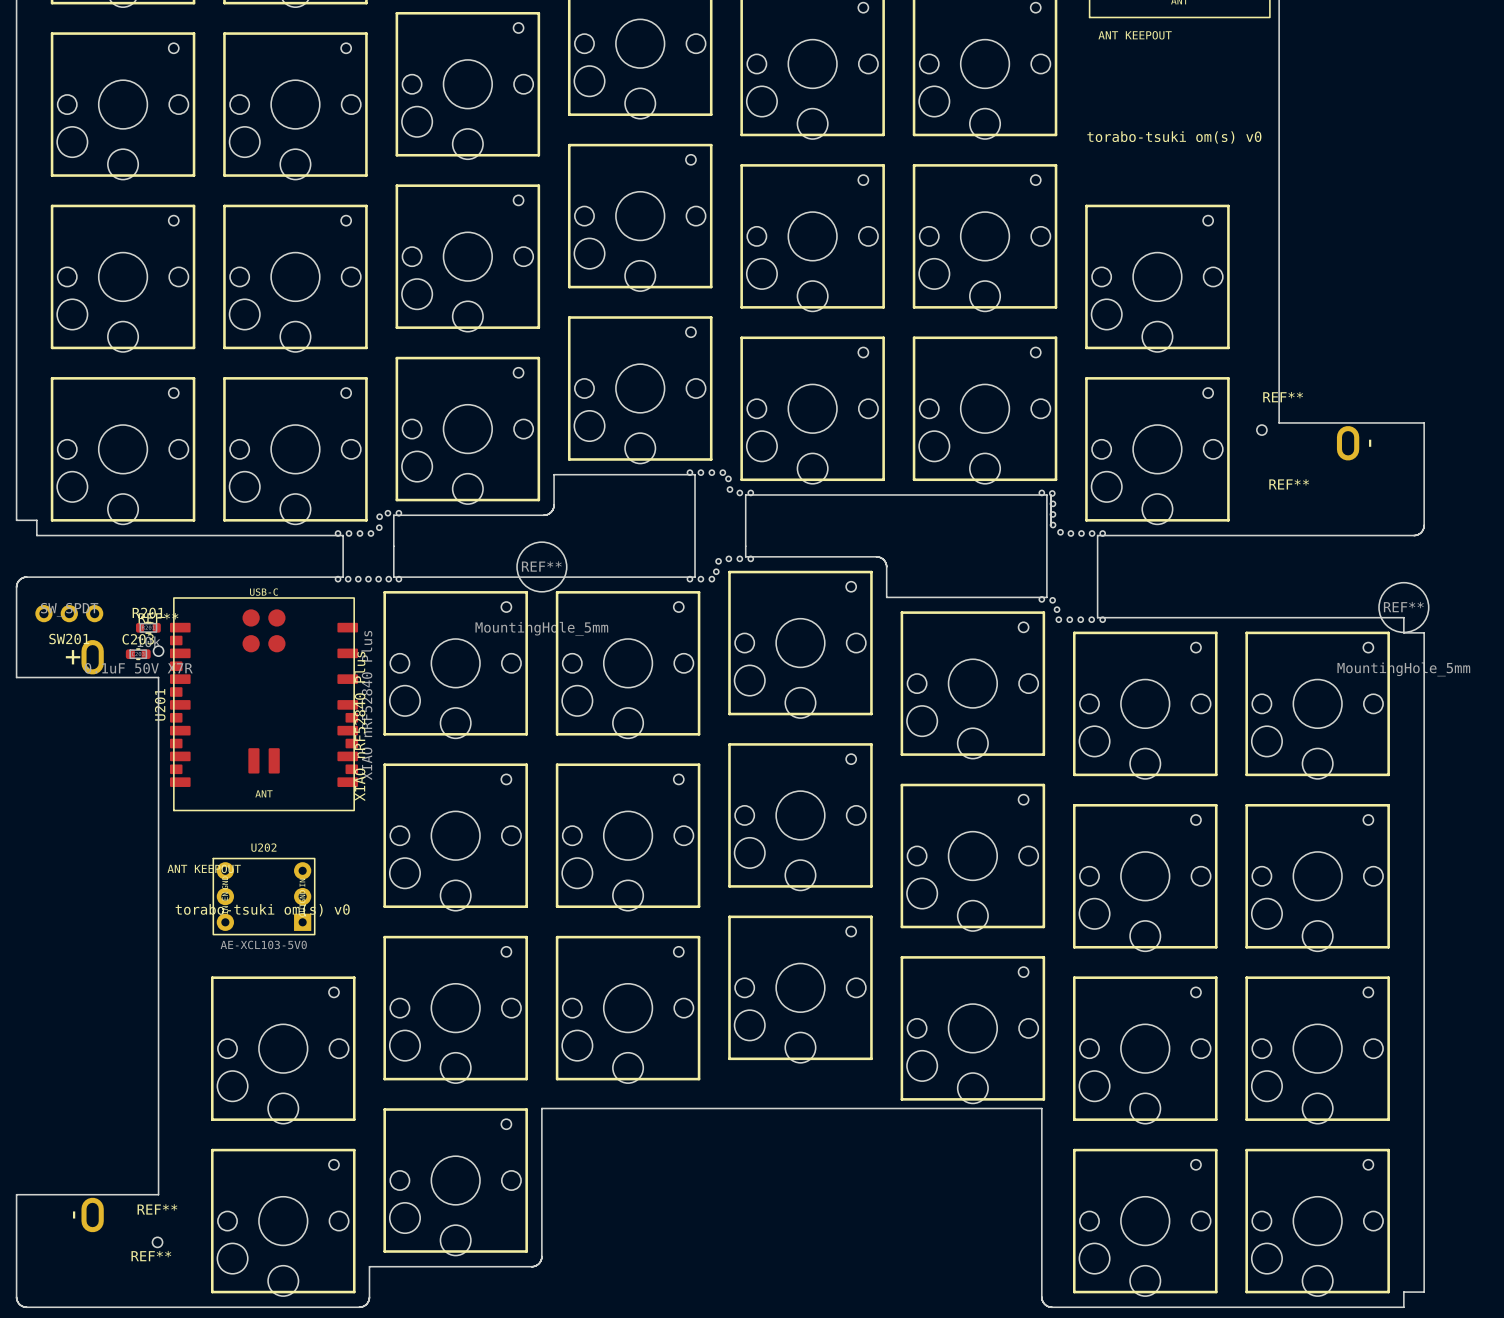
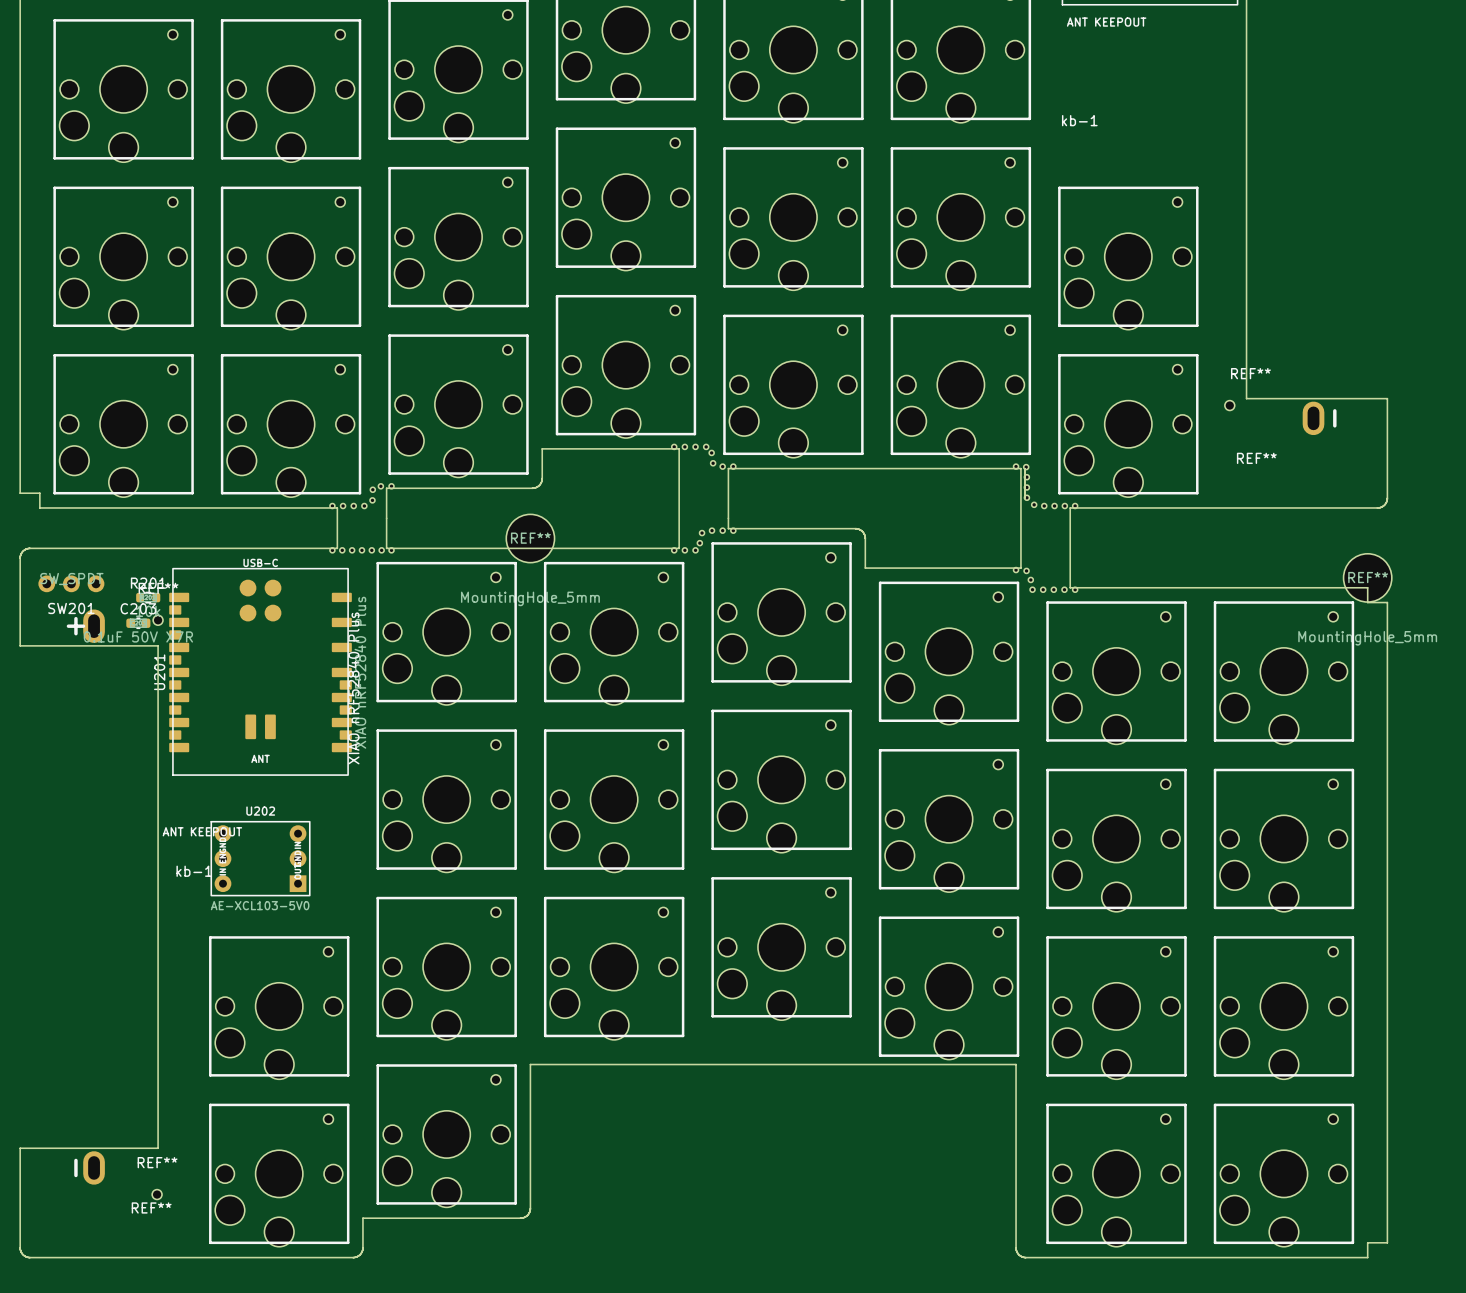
text: torabo-tsuki om(s) v0 (1174, 137) -> kb-1 (1079, 120)
text: torabo-tsuki om(s) v0 (262, 910) -> kb-1 (194, 871)

